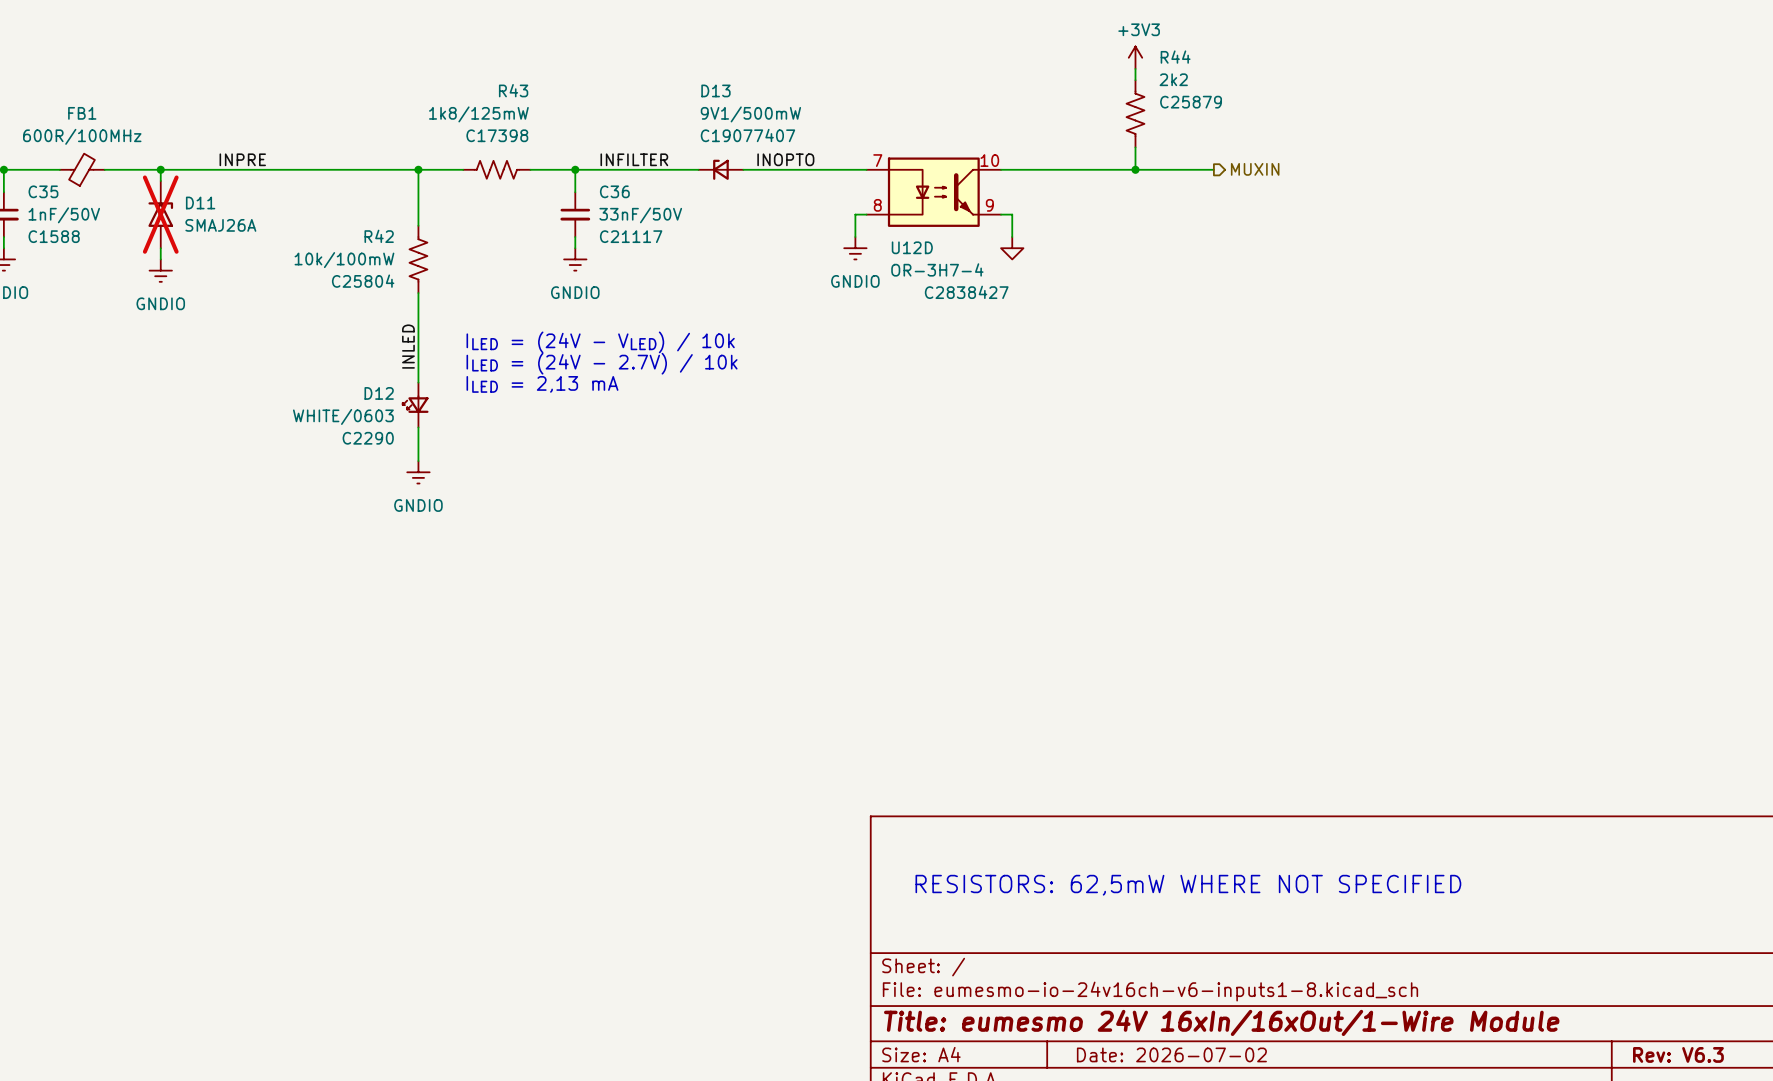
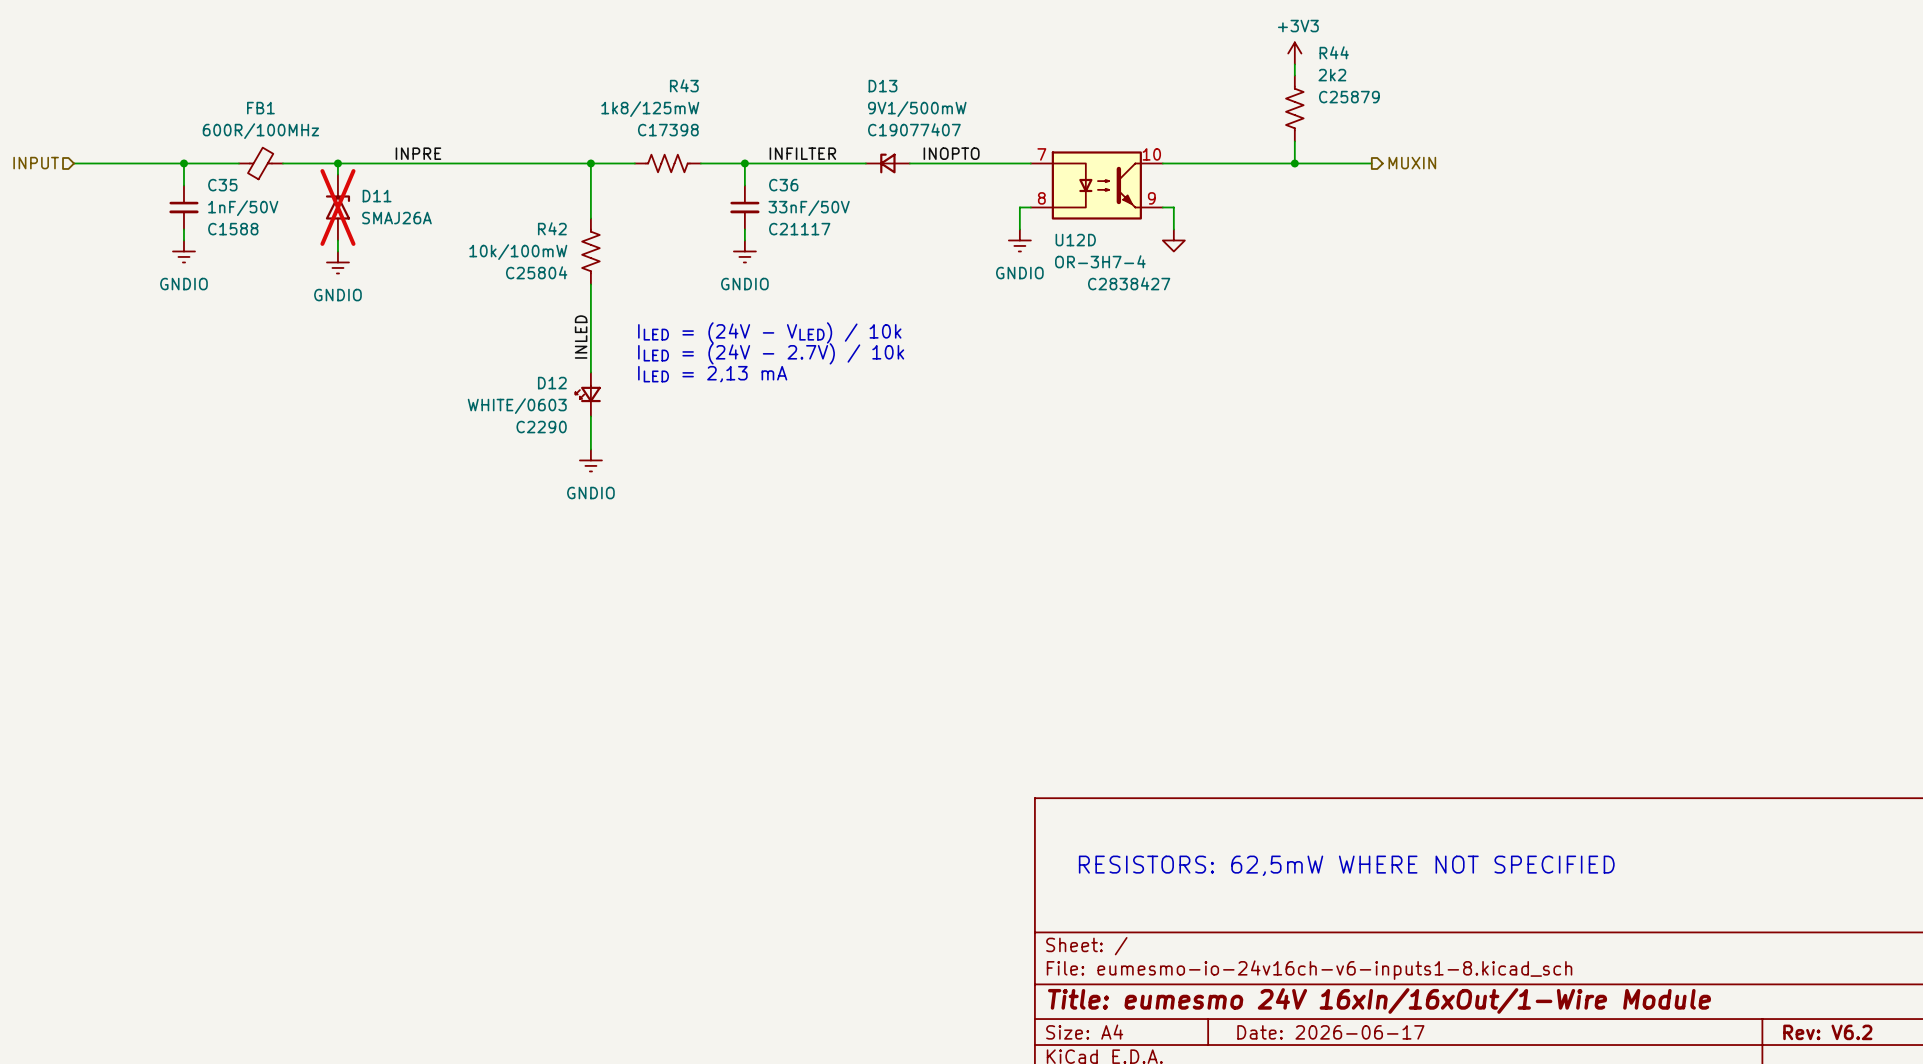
title block: Date: 2026-07-02 (1171, 1054) -> Date: 2026-06-17 (1330, 1032)
title block: Rev: V6.3 (1678, 1054) -> Rev: V6.2 (1827, 1032)

